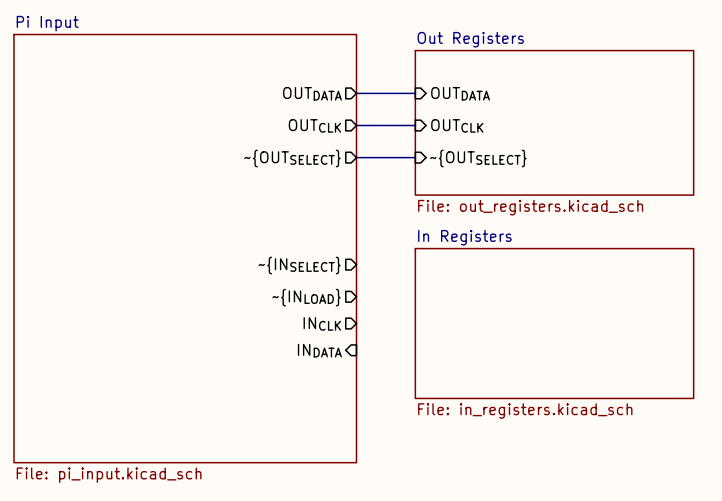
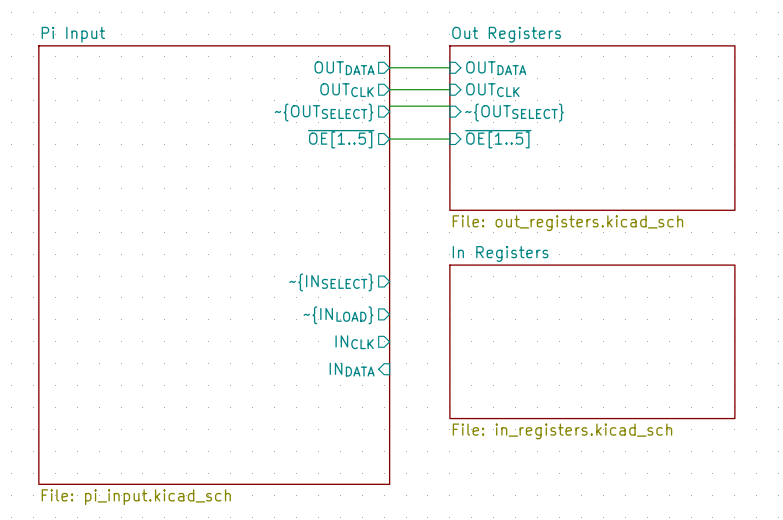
sheet Out Registers shape: [414, 49, 695, 196] -> [449, 45, 736, 211]
wire: none -> (389, 67) (449, 67)
sheet pin: none -> OUTCLK (347, 90)
sheet pin: none -> OUTCLK (492, 90)
sheet pin position: OUTDATA (312, 93) -> OUTDATA (344, 68)
sheet pin position: OUTDATA (460, 93) -> OUTDATA (496, 68)
sheet pin: none -> ~{OUTSELECT} (324, 112)
sheet pin: none -> ~{OUTSELECT} (514, 112)
sheet pin: OUTCLK (314, 125) -> ~{OE[1..5]} (341, 139)
sheet pin: OUTCLK (457, 125) -> ~{OE[1..5]} (498, 139)
wire: (356, 157) (415, 157) -> (389, 89) (449, 89)
sheet pin: ~{OUTSELECT} (292, 158) -> none
sheet pin: ~{OUTSELECT} (478, 158) -> none

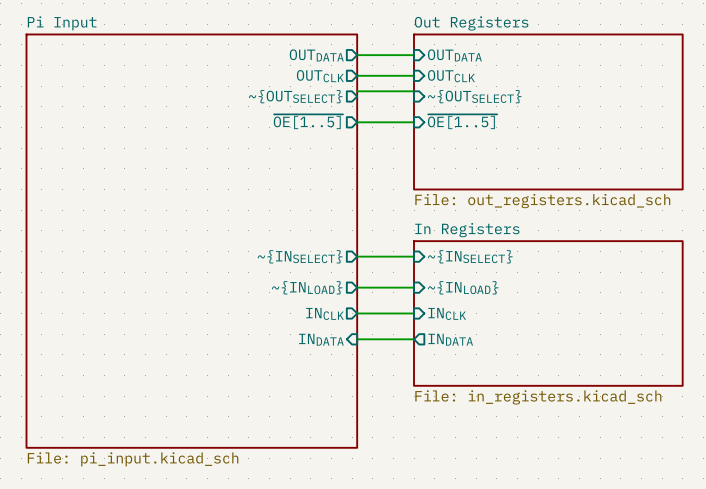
wire: none -> (357, 256) (414, 256)
sheet pin: none -> ~{INSELECT} (470, 256)
wire: none -> (357, 287) (414, 287)
sheet pin: none -> ~{INLOAD} (463, 287)
wire: none -> (357, 313) (414, 313)
sheet pin: none -> INCLK (447, 313)
wire: none -> (357, 339) (414, 339)
sheet pin: none -> INDATA (450, 339)

